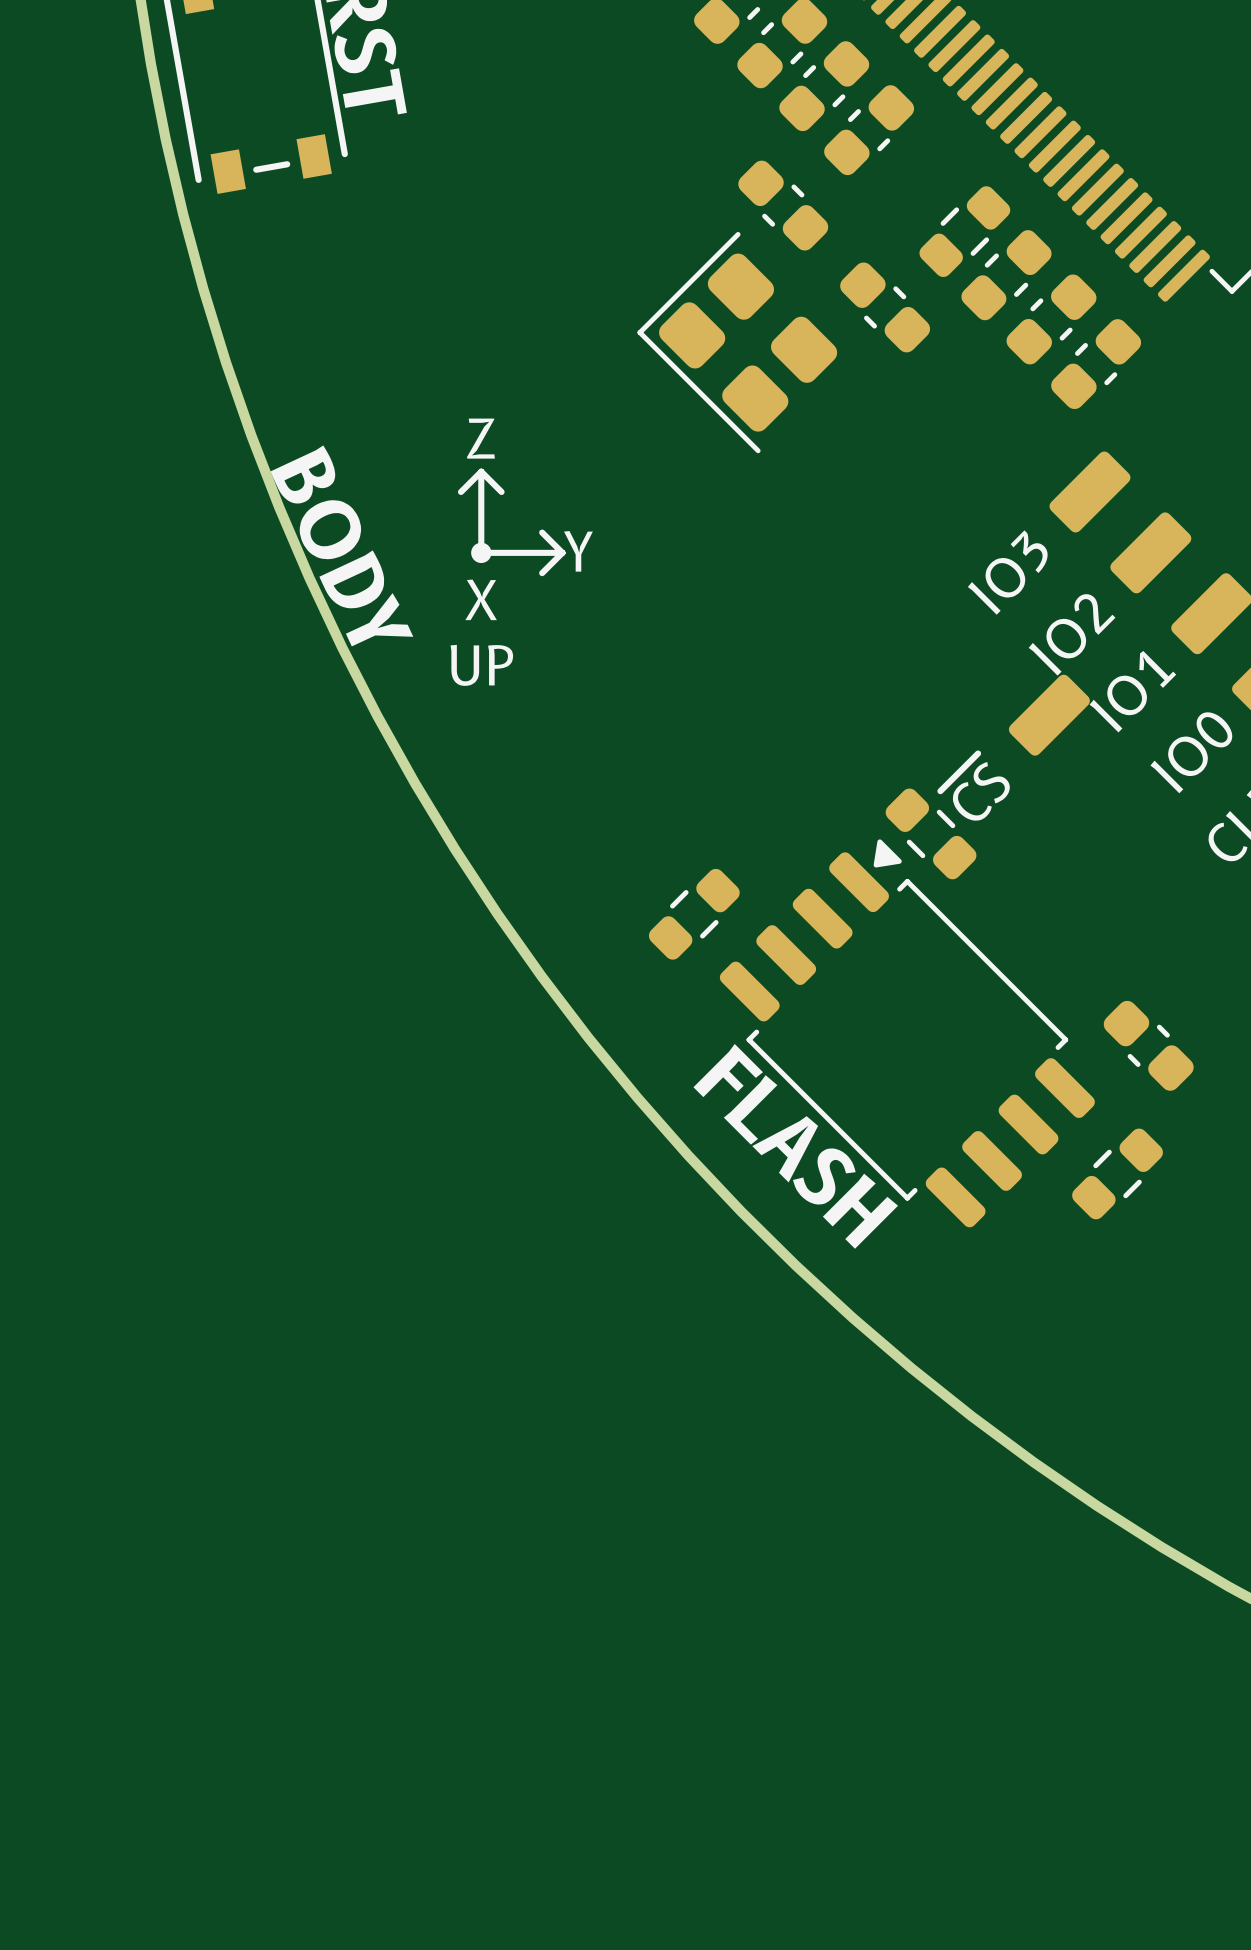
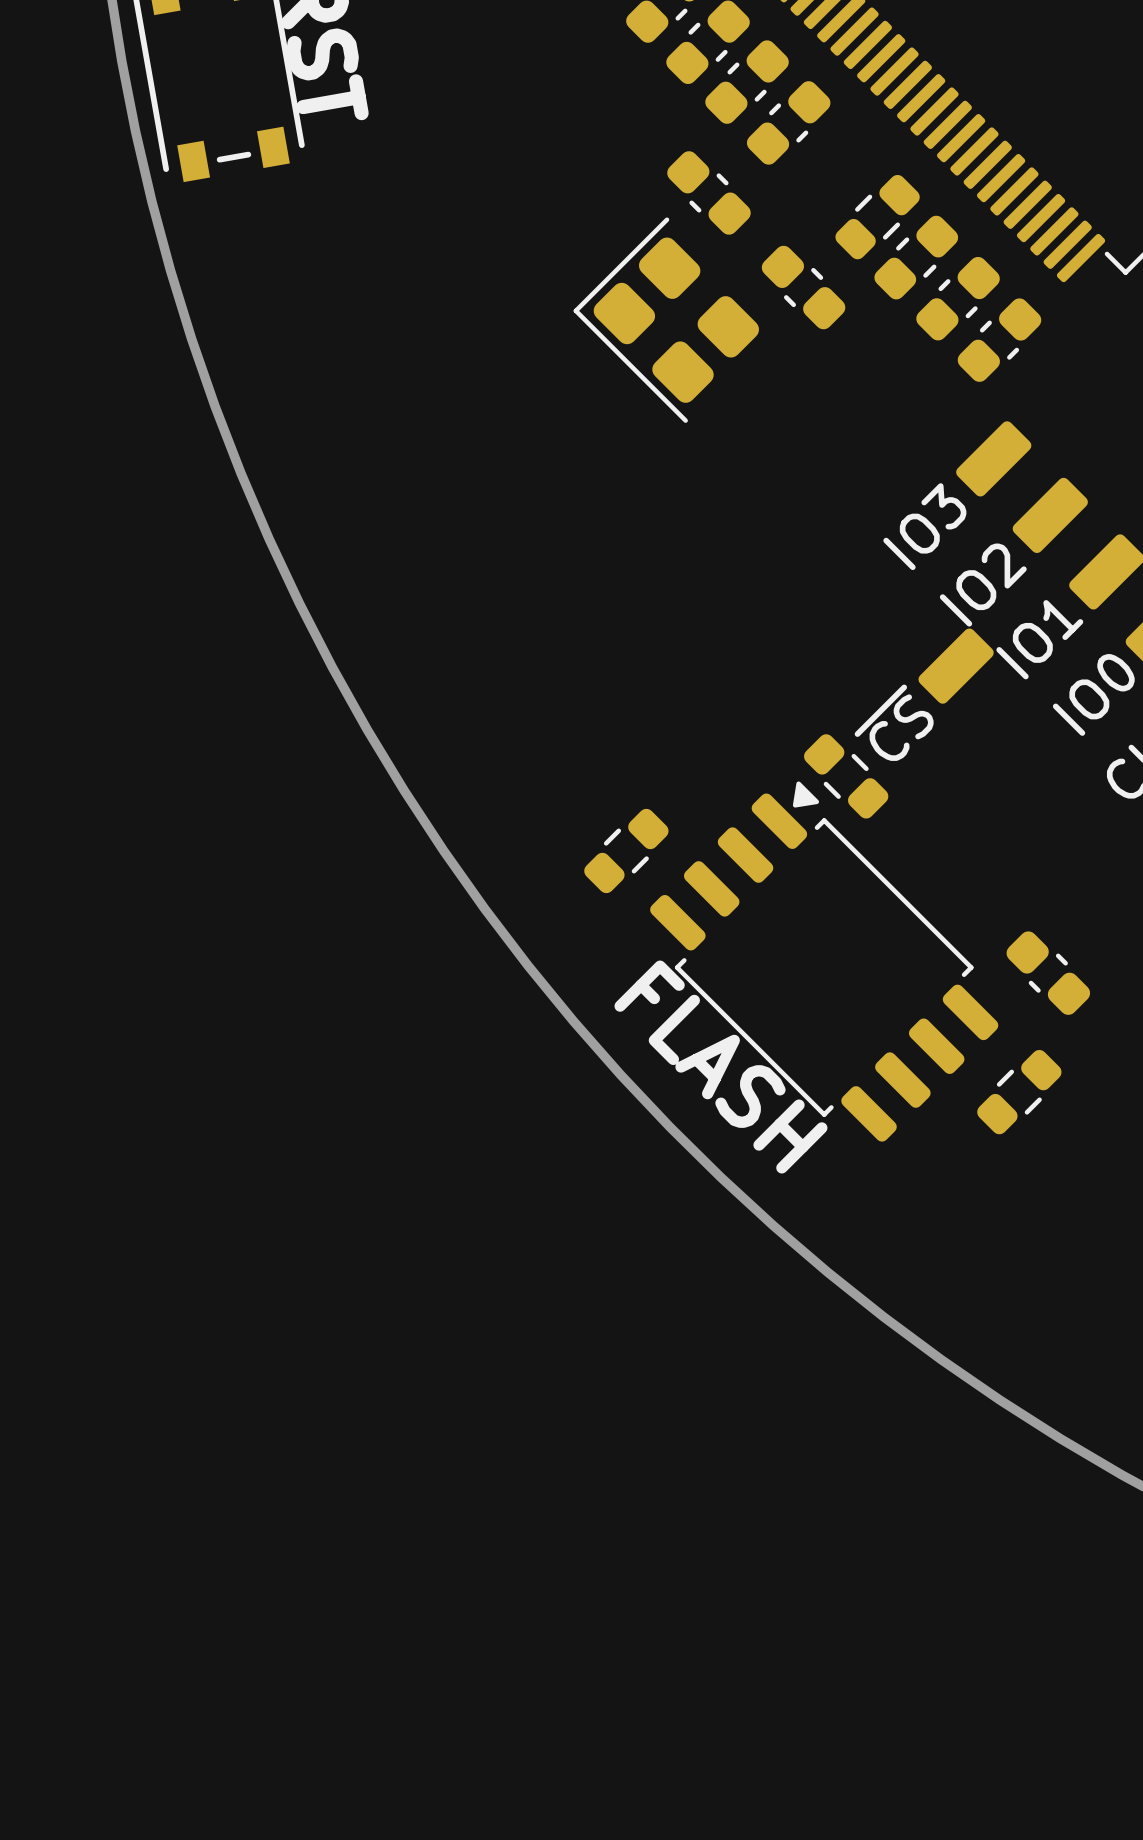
text: Z (480, 438) -> none
line: (481, 471) (501, 491) -> none
line: (481, 471) (481, 552) (562, 552) -> none
line: (481, 471) (461, 491) -> none
line: (542, 532) (562, 552) -> none
drawing: [471, 542, 492, 564] -> none
text: BODY (341, 545) -> none
text: Y (578, 551) -> none
line: (562, 552) (542, 573) -> none
text: X (481, 599) -> none
text: UP (481, 665) -> none

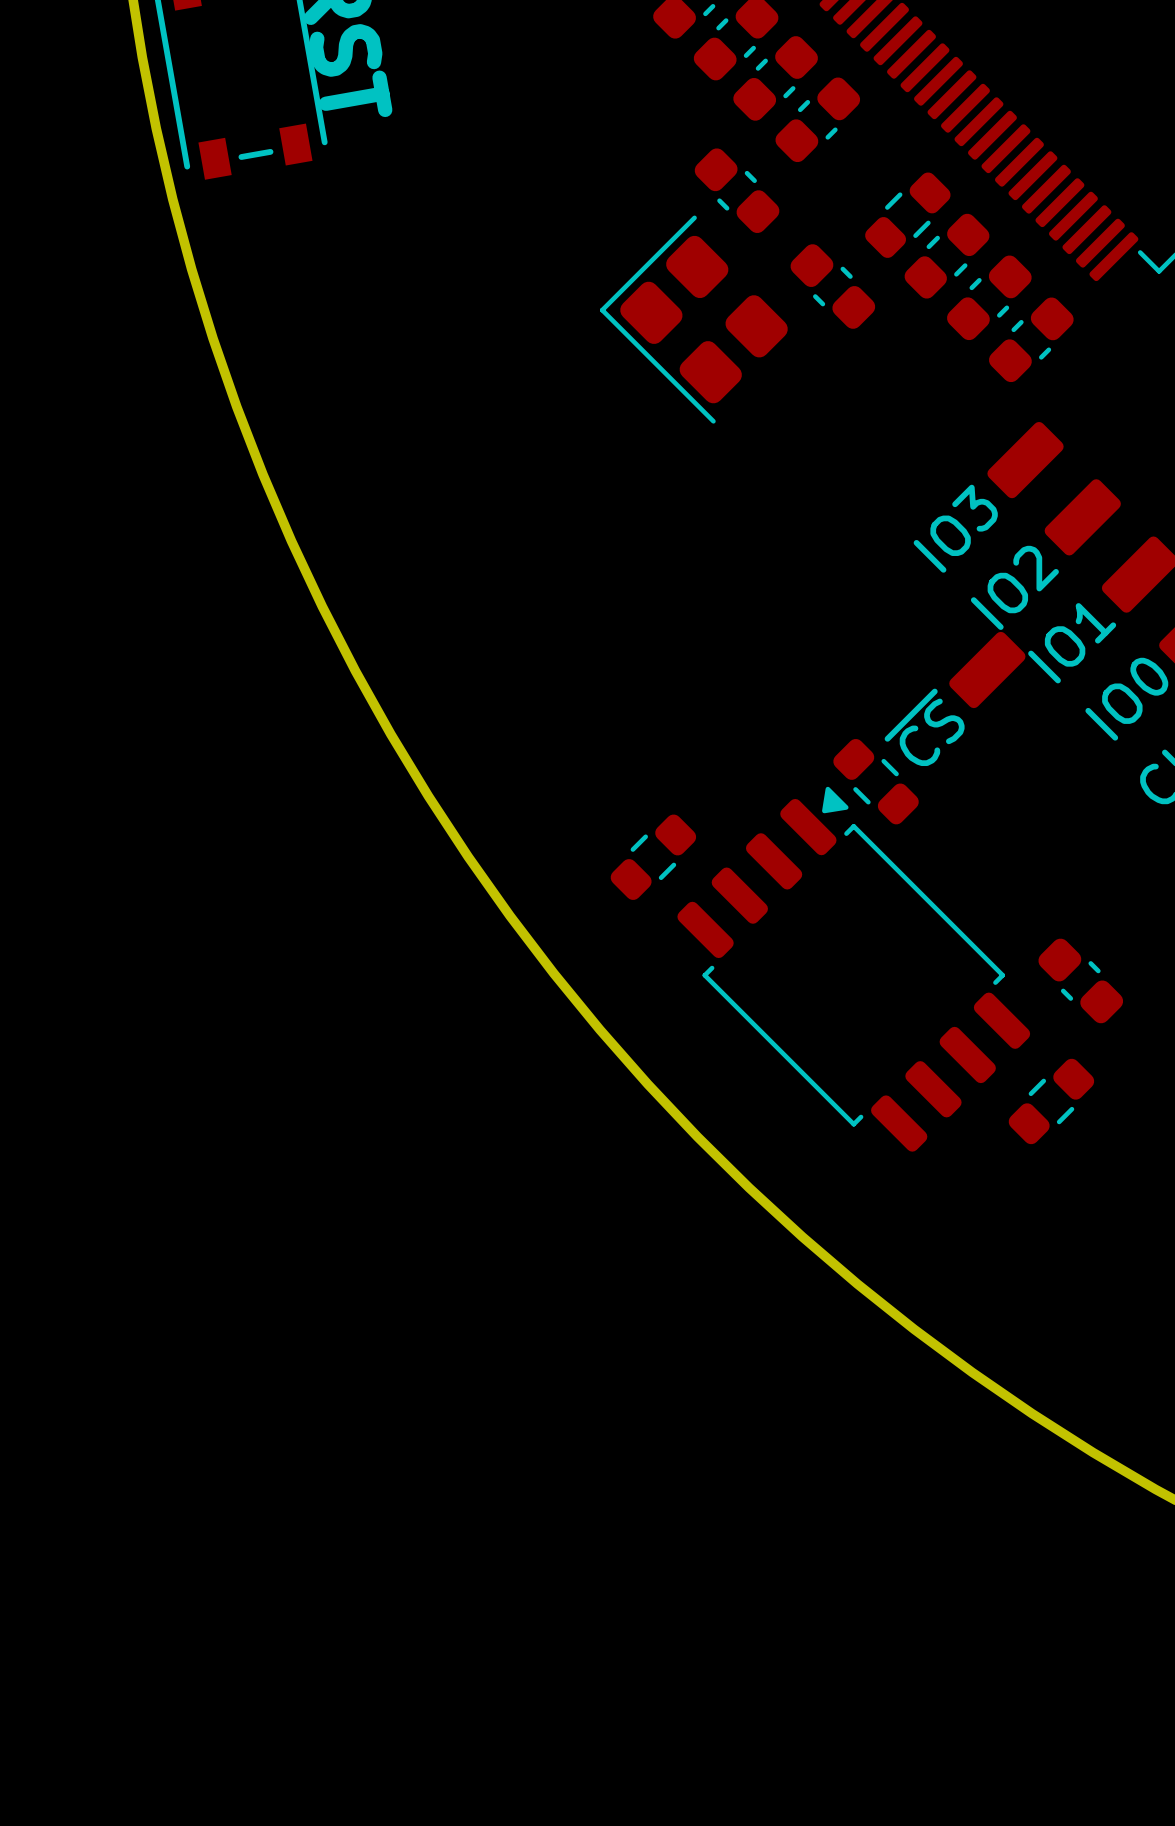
text: FLASH (720, 1067) -> none

